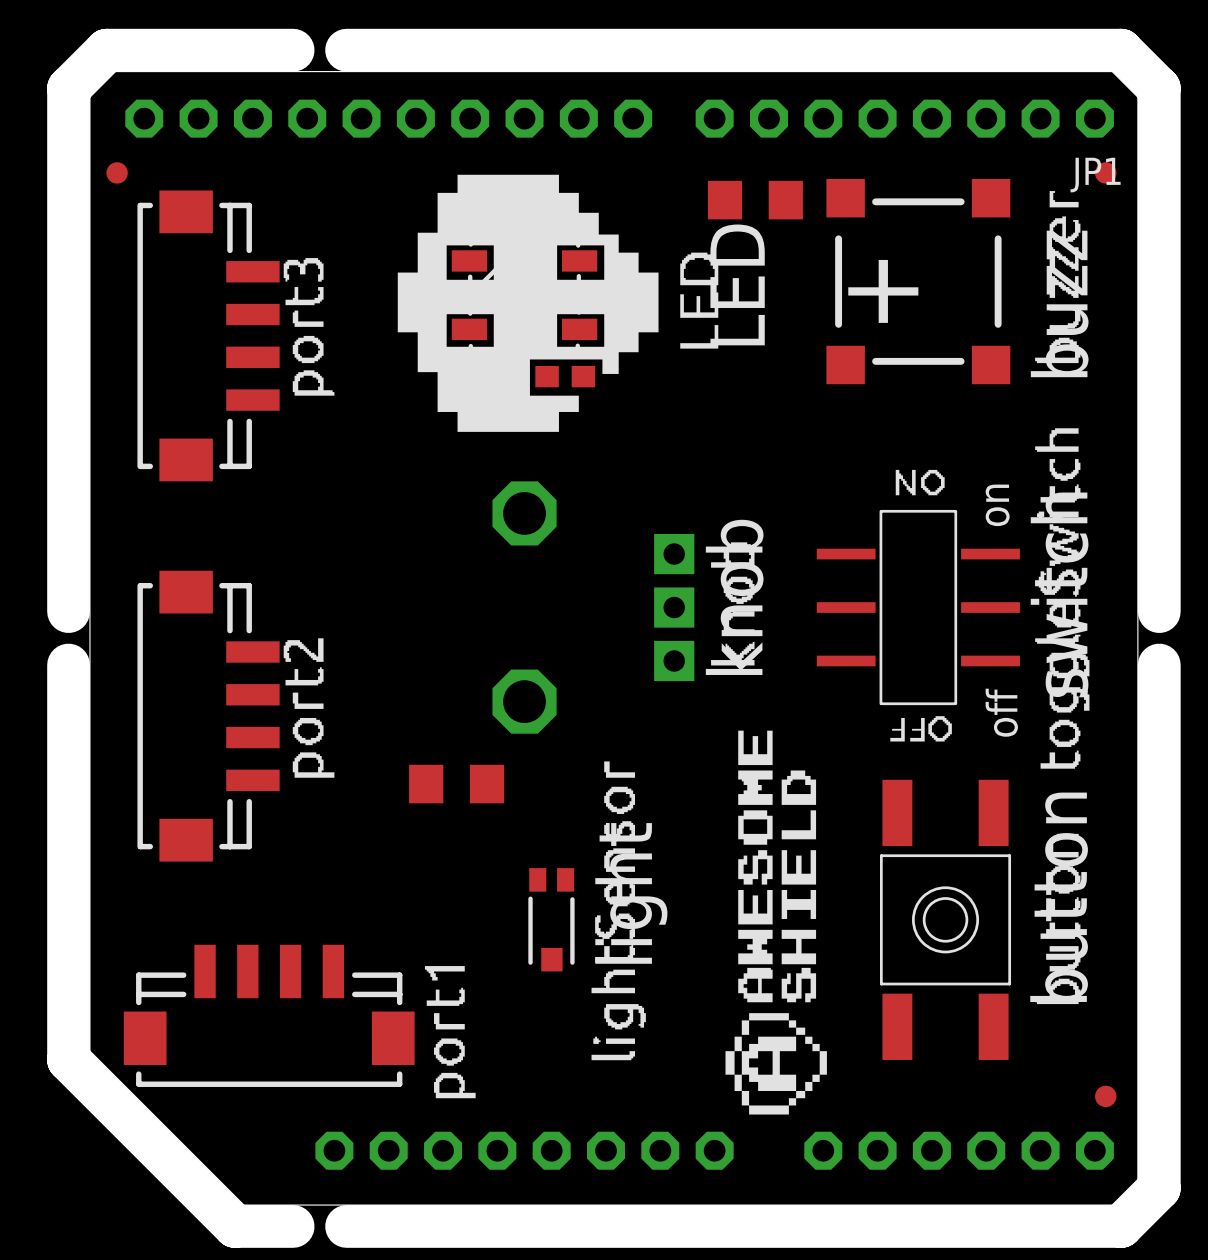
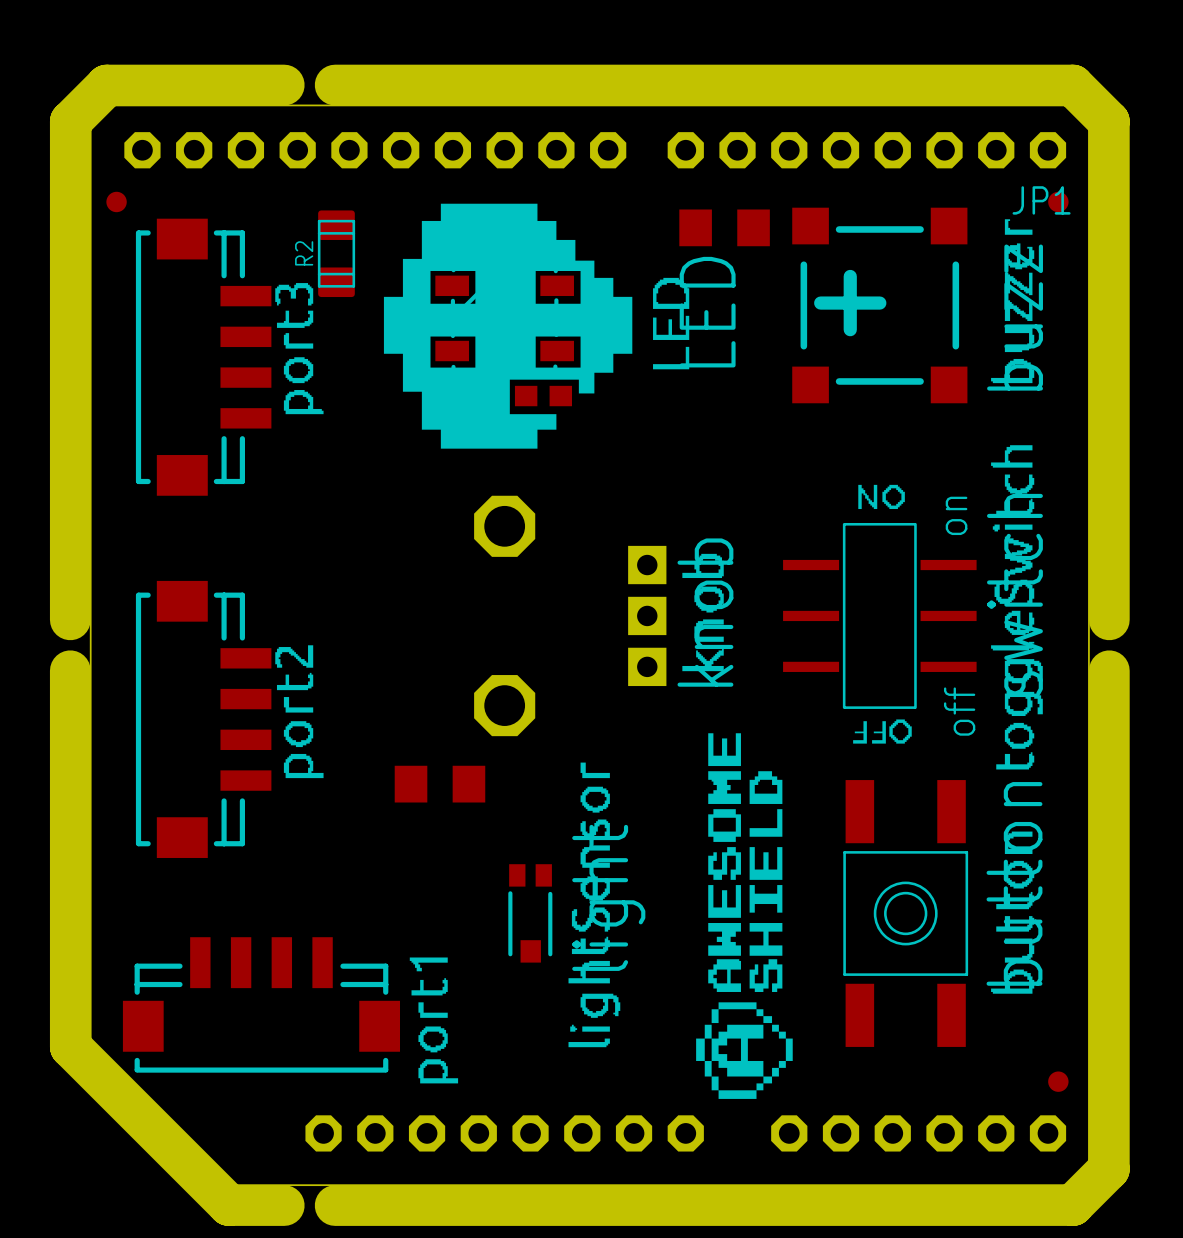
R2: none -> (336, 253)

